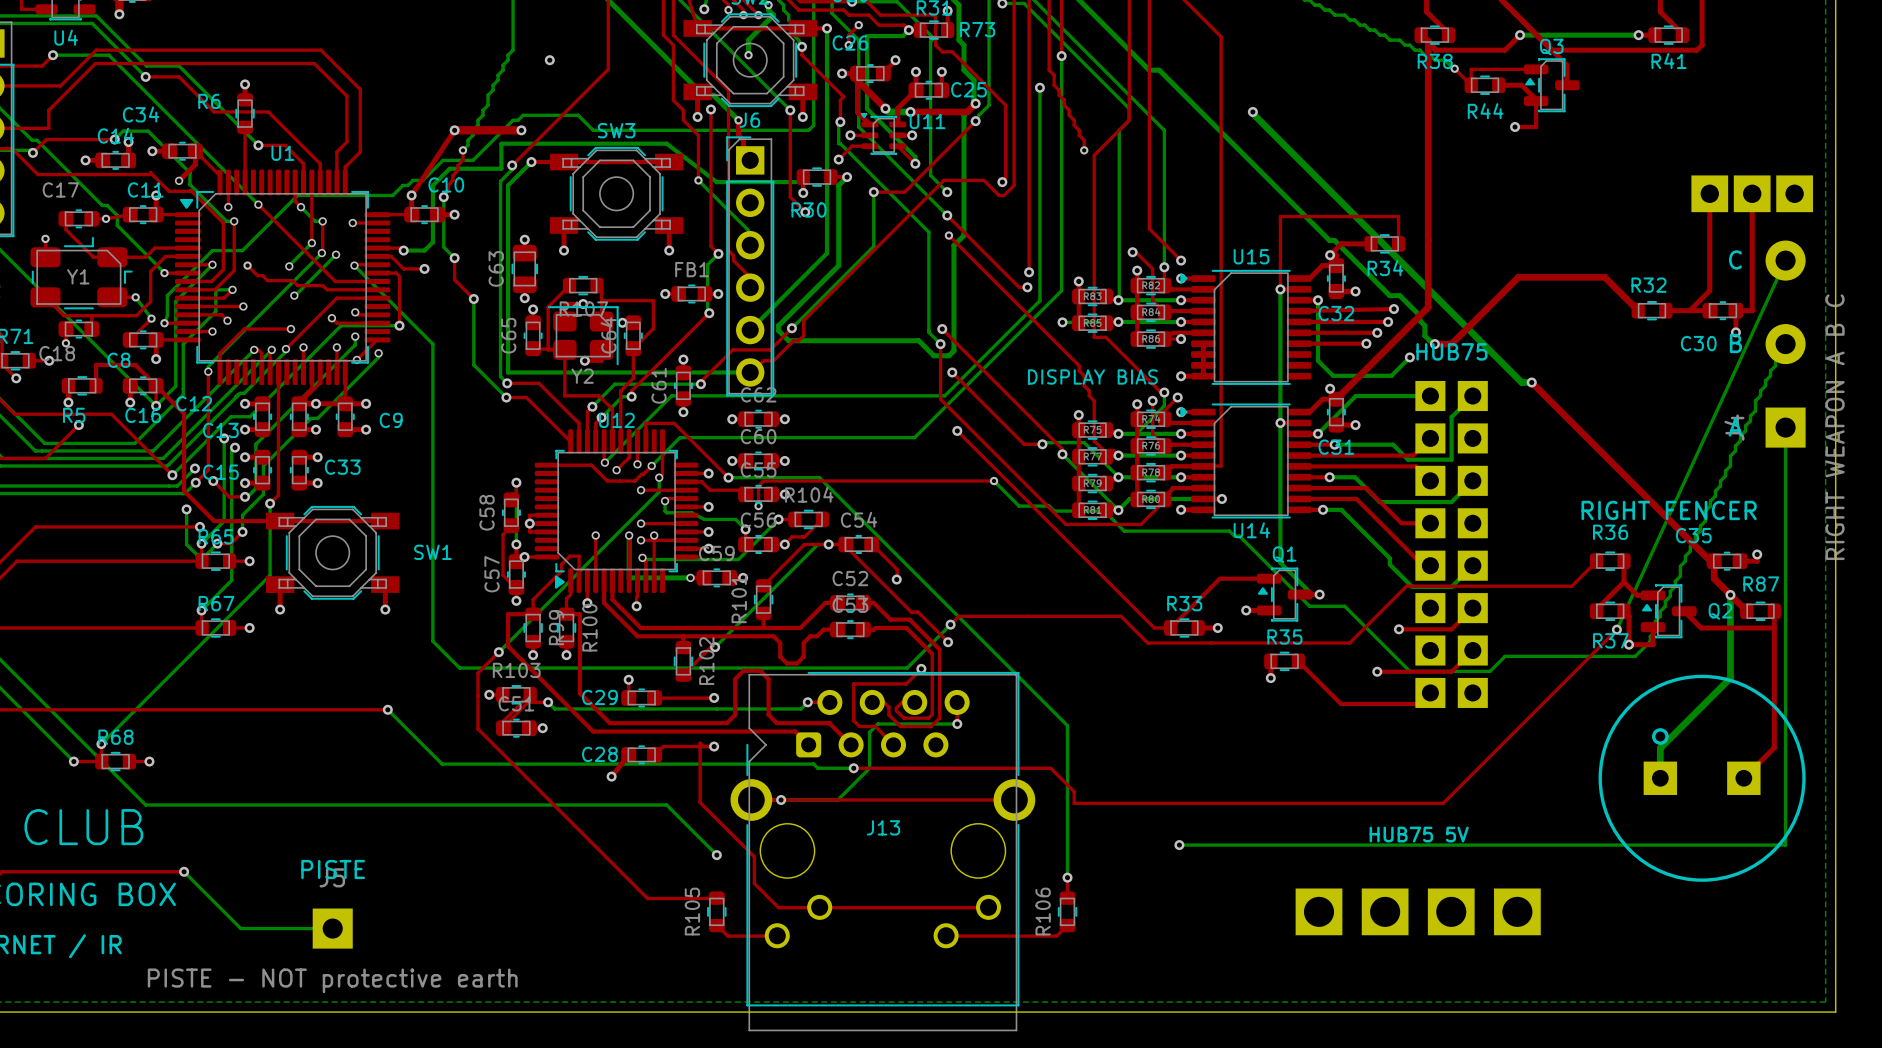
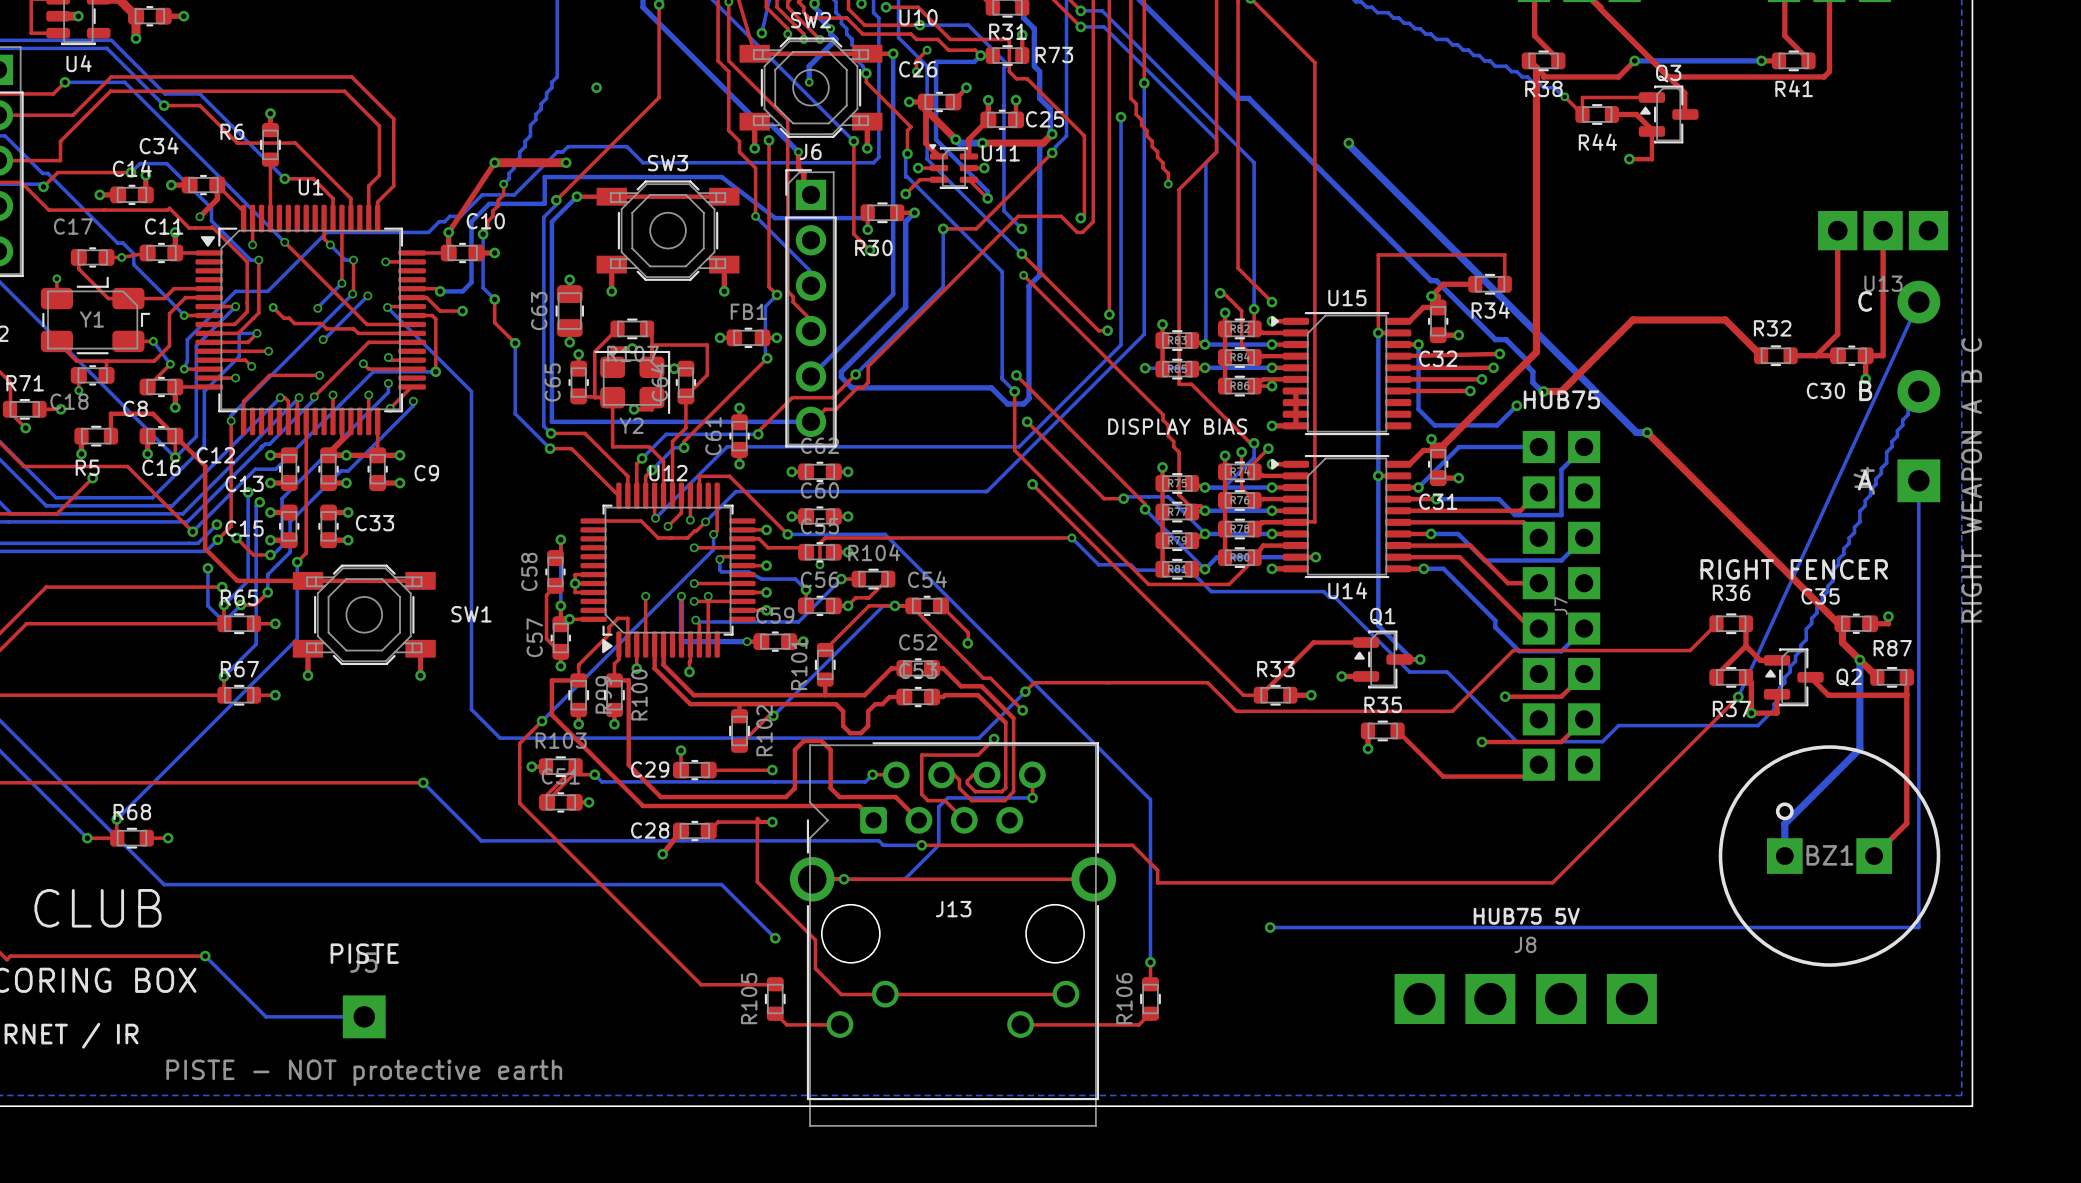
U13 name: none -> U13 (1883, 283)
J7 name: none -> J7 (1561, 605)
BZ1 name: none -> BZ1 (1829, 855)
J8 name: none -> J8 (1525, 944)

